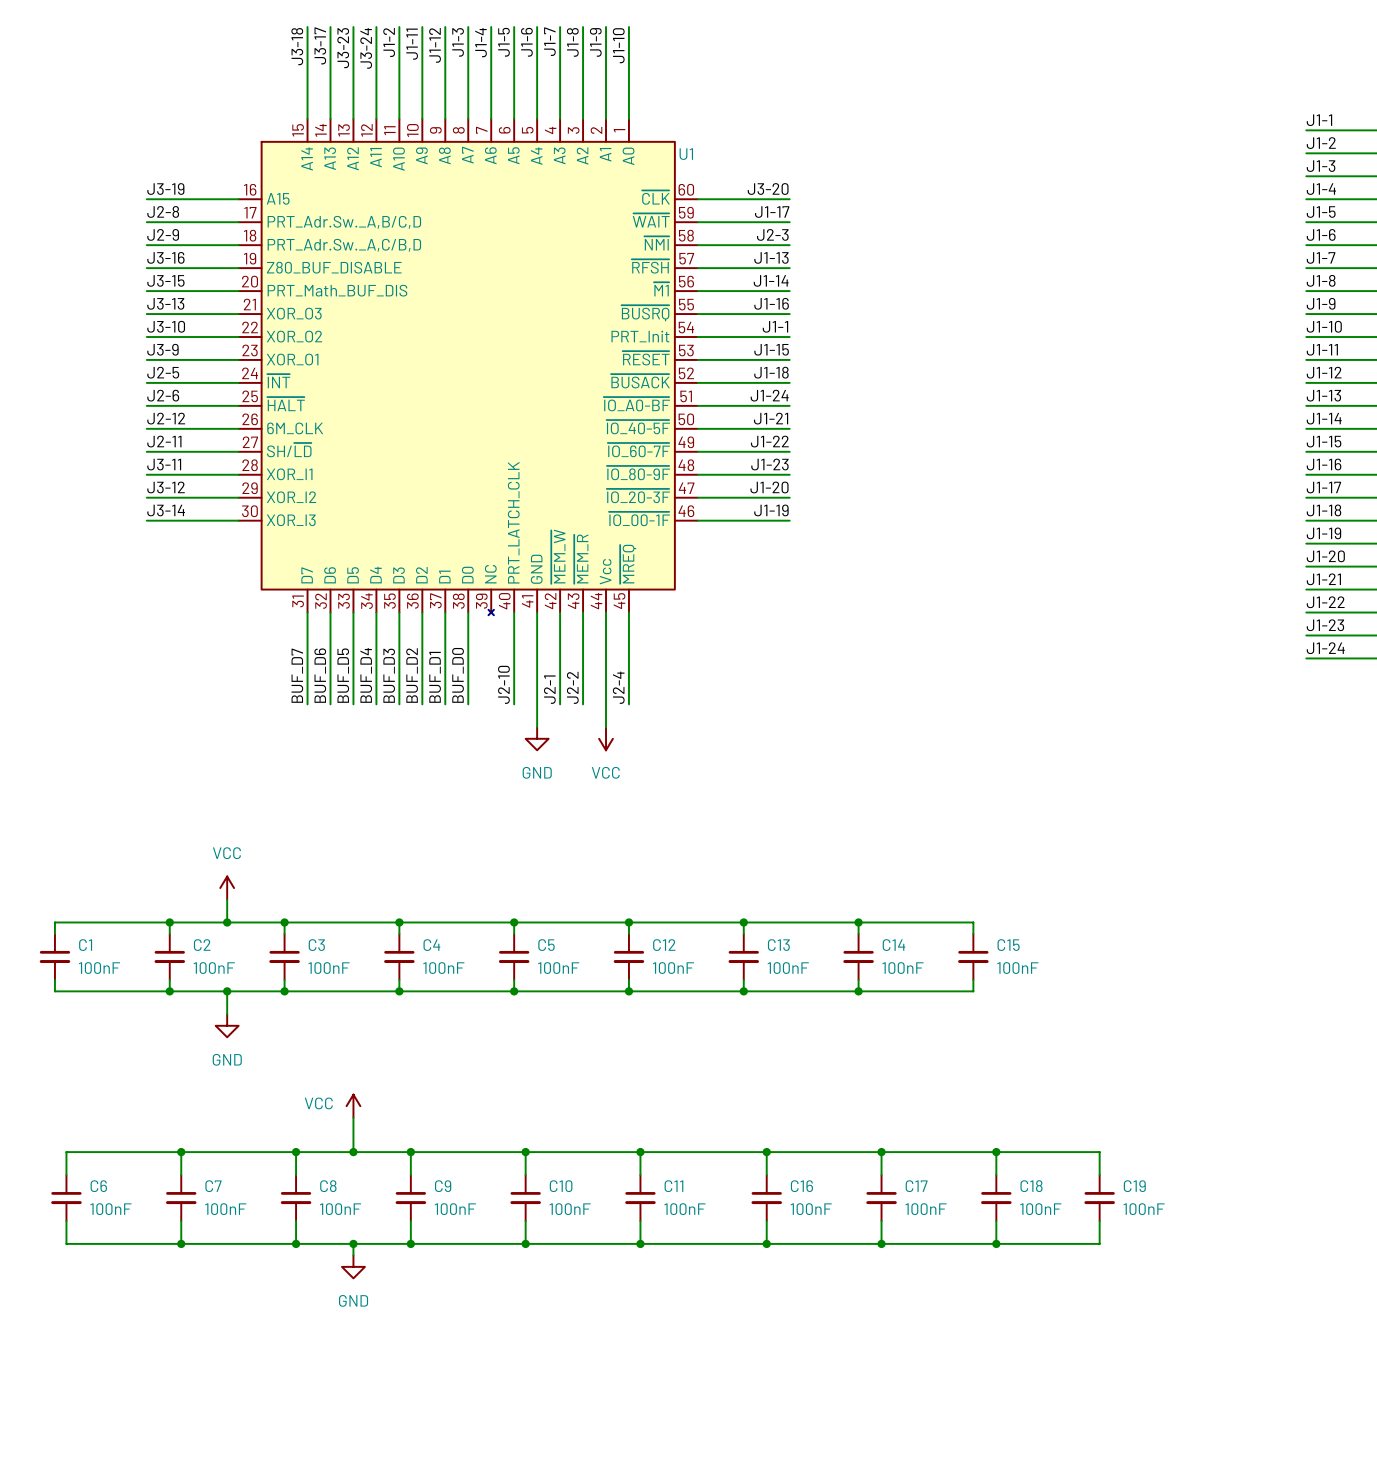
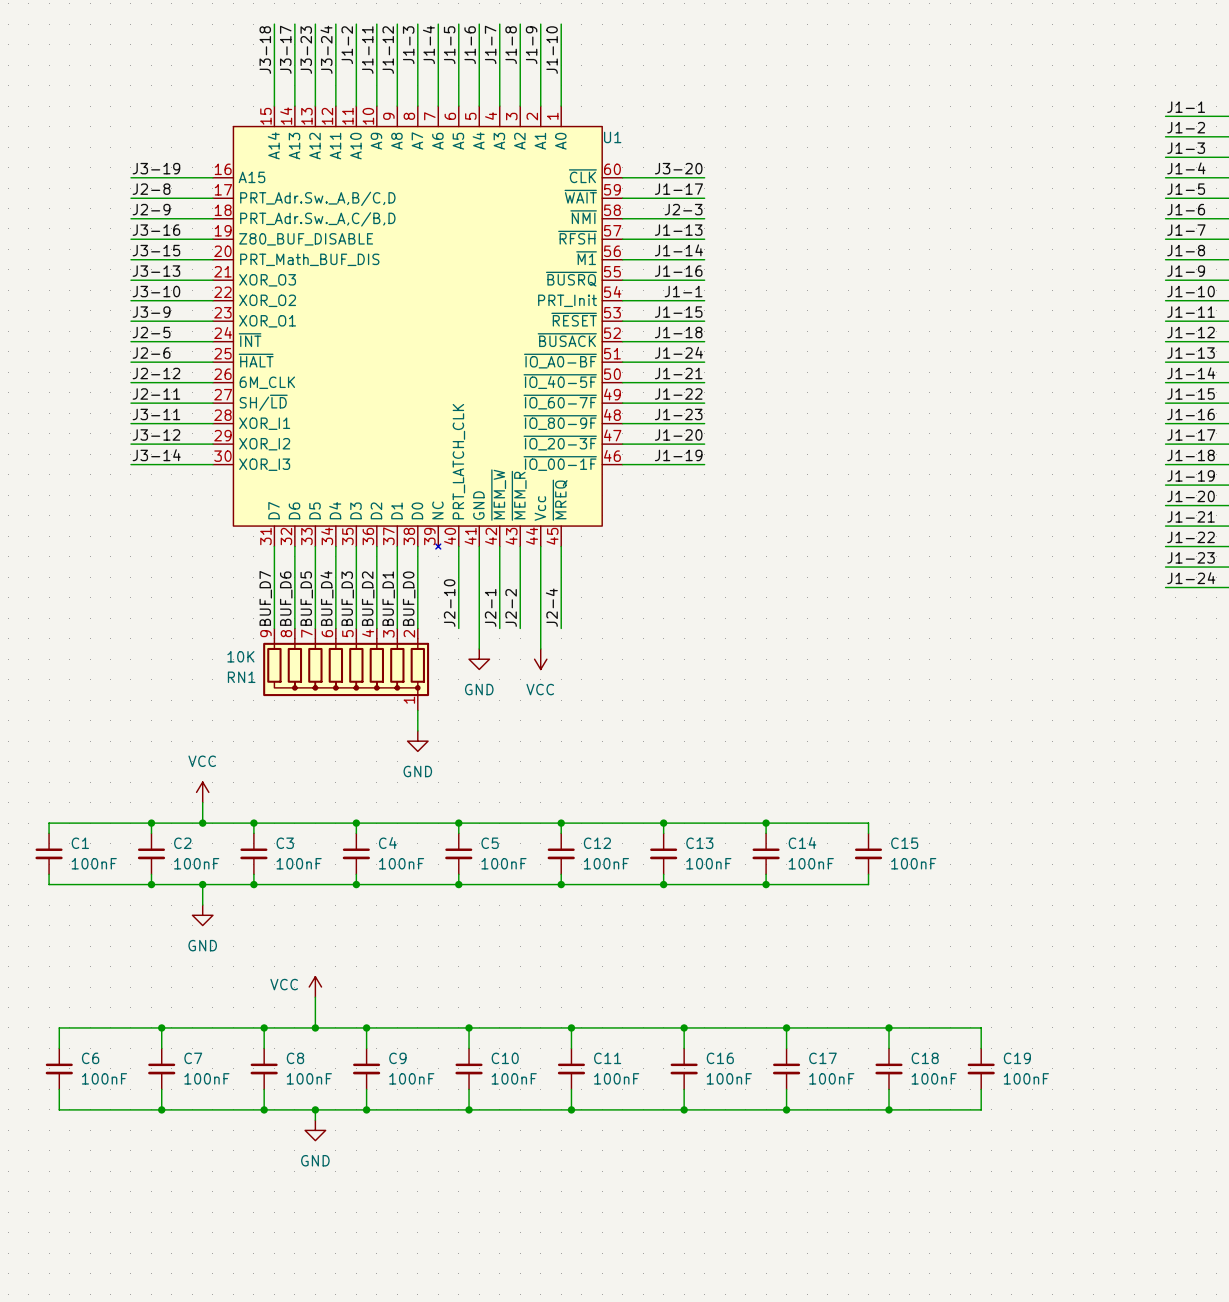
RN1: none -> 10K (346, 669)
wire: none -> (417, 710) (417, 730)
power symbol: none -> GND (417, 741)

